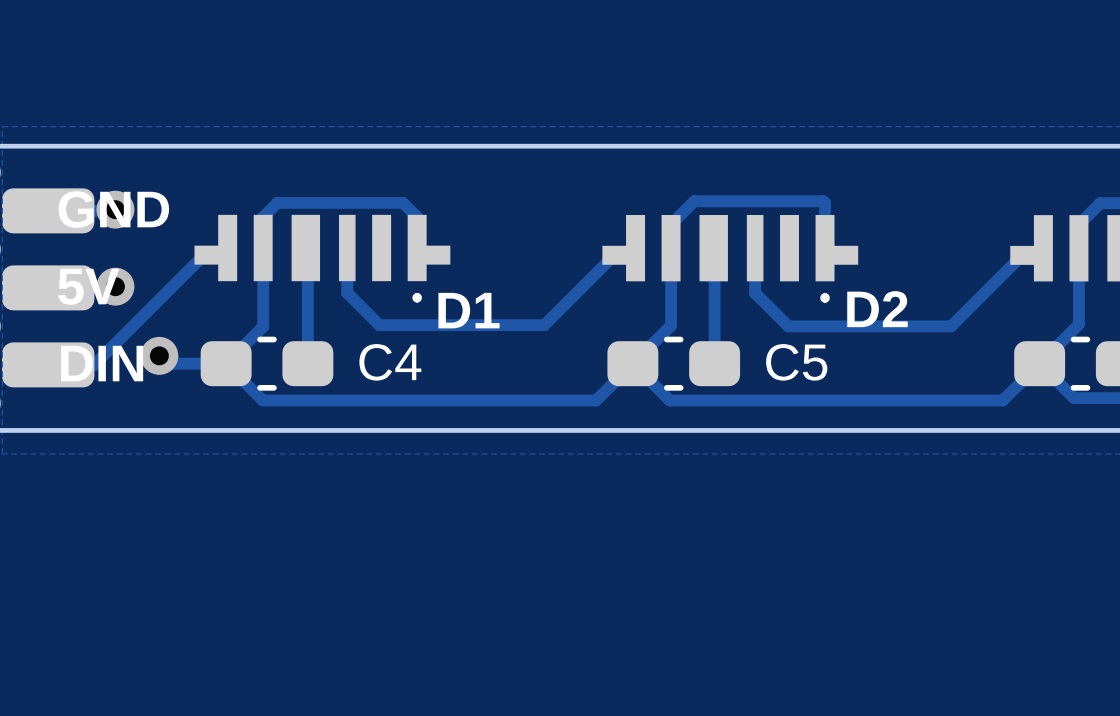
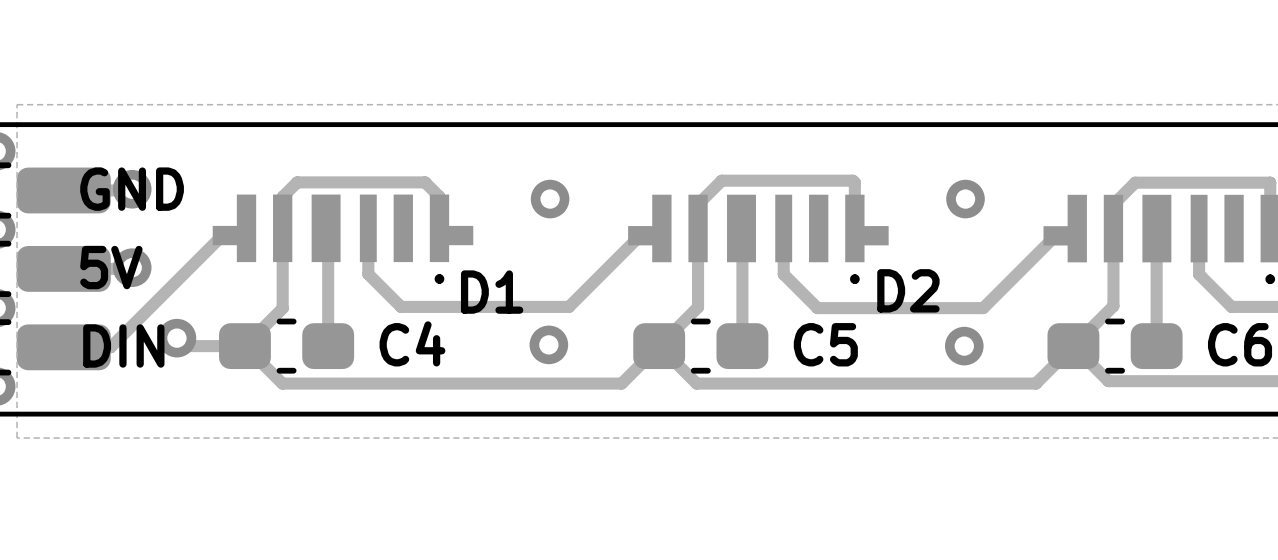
via: none -> (550, 199)
via: none -> (965, 199)
via: none -> (548, 344)
via: none -> (964, 346)

